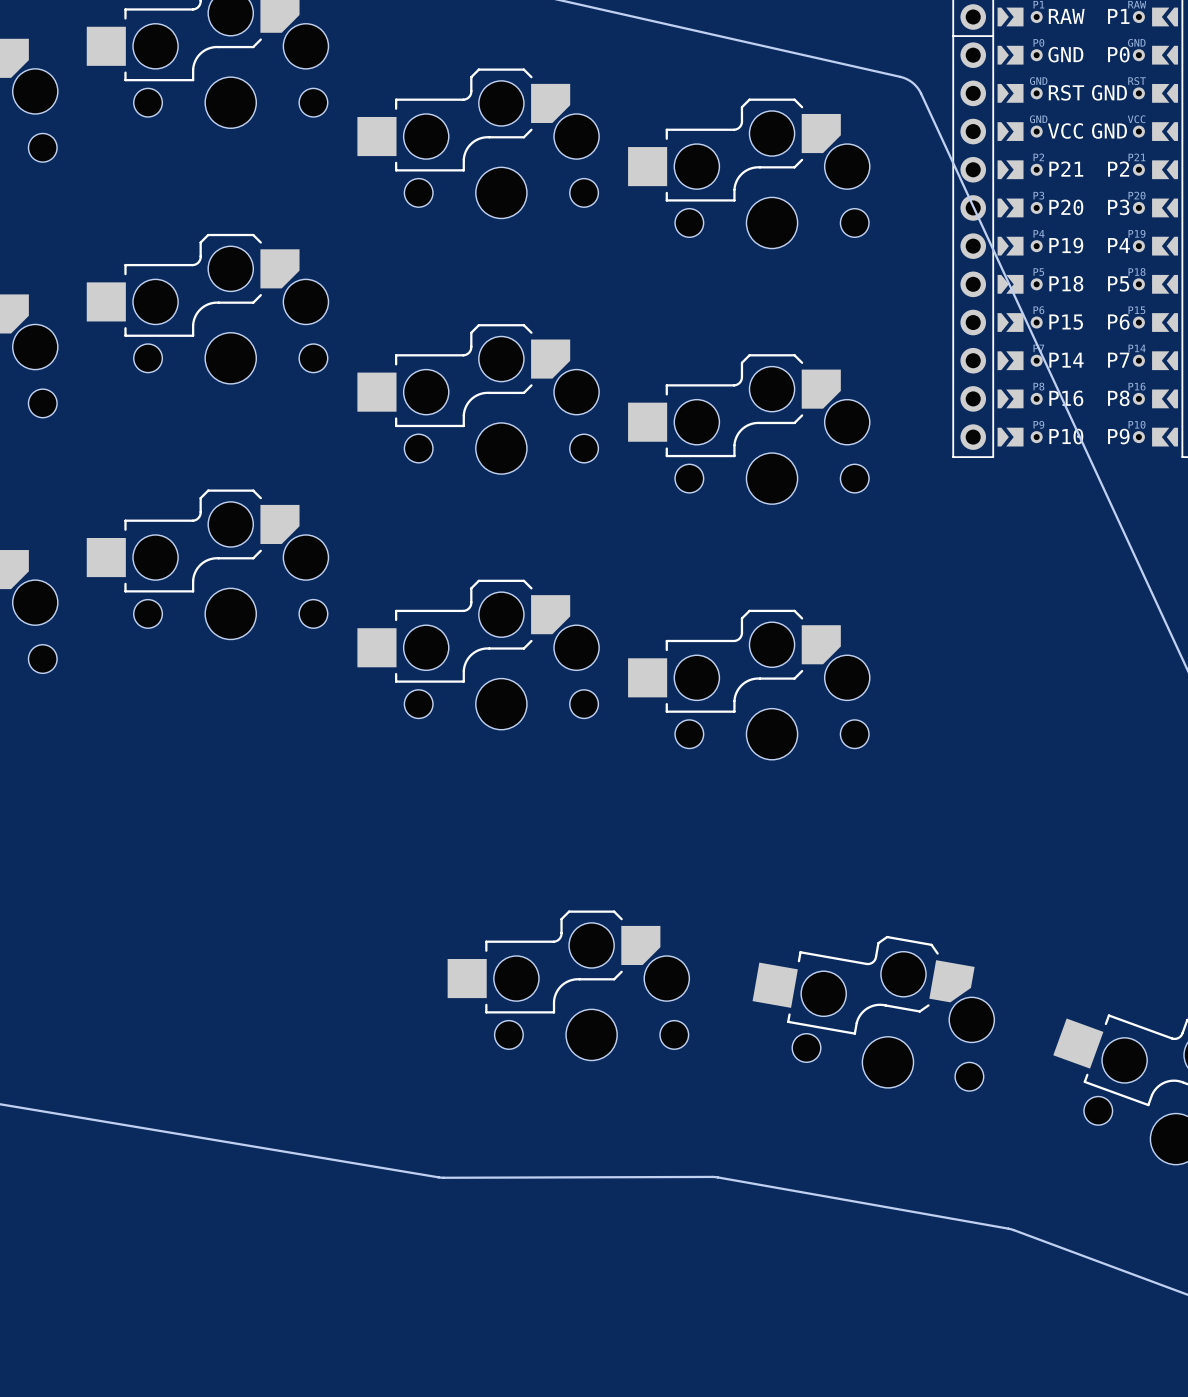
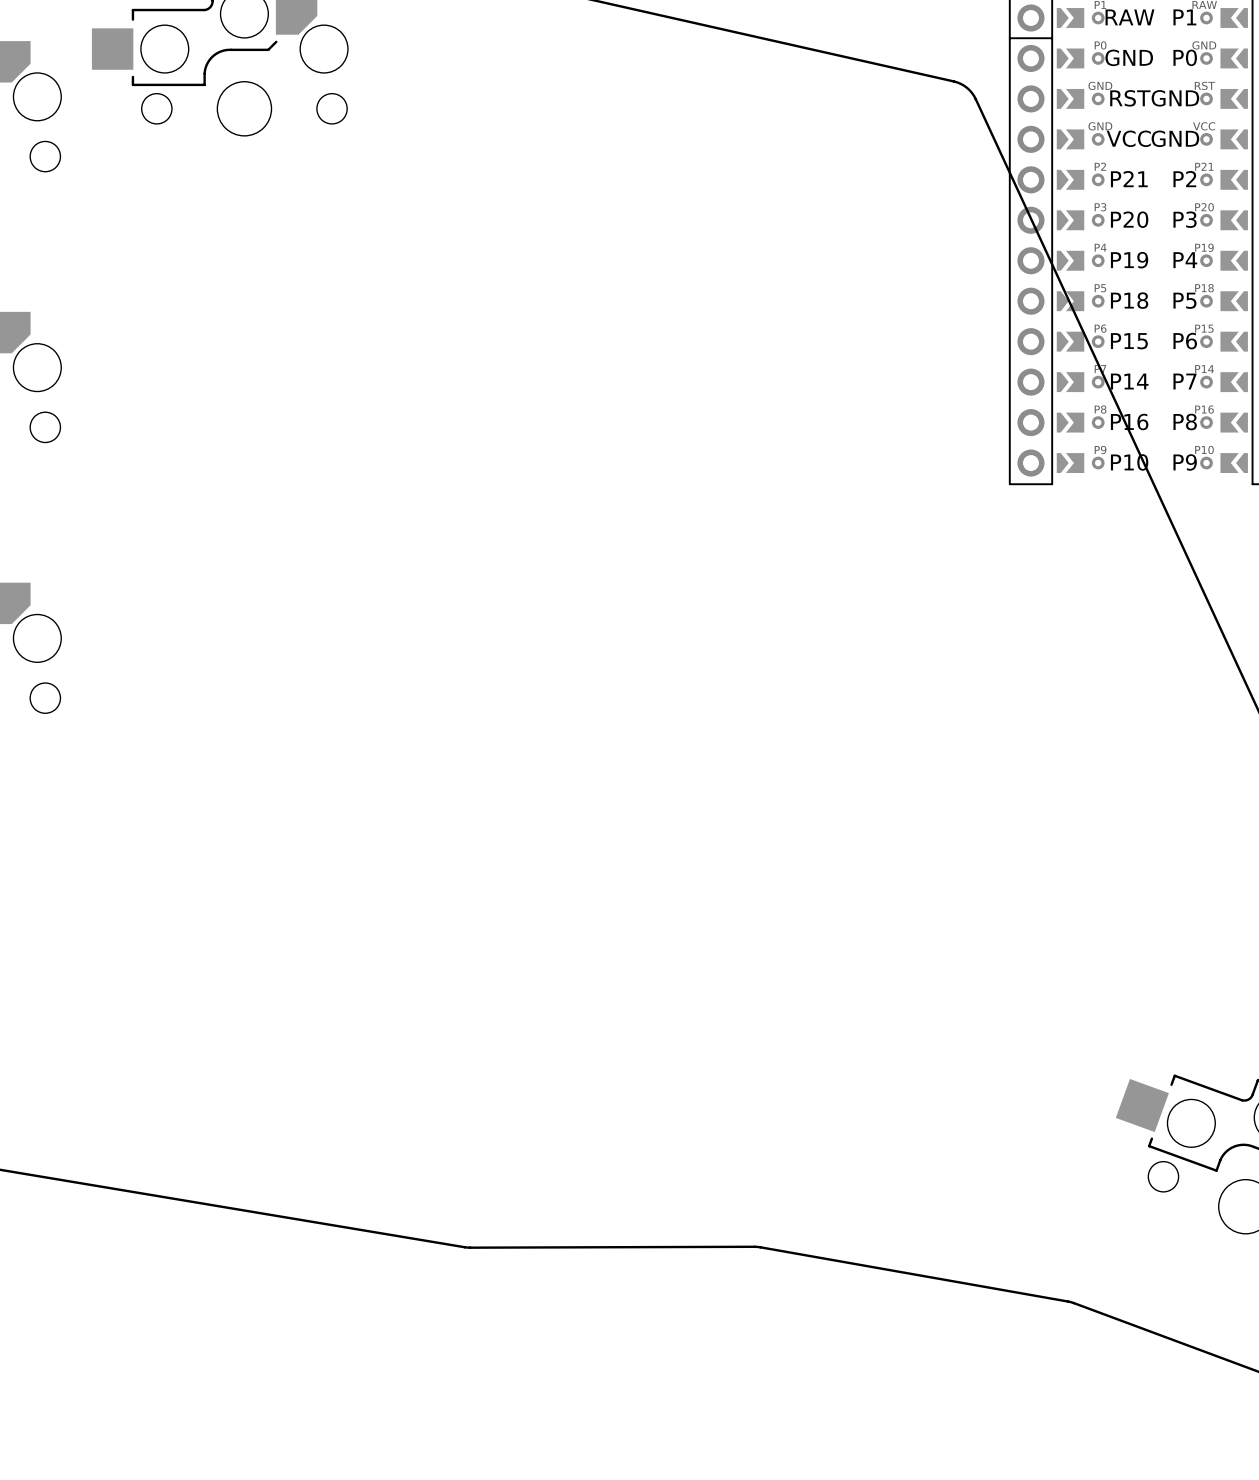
part: (478, 143) -> none
part: (748, 173) -> none
part: (207, 308) -> none
part: (478, 399) -> none
part: (748, 429) -> none
part: (207, 564) -> none
part: (478, 654) -> none
part: (748, 684) -> none
part: (568, 985) -> none
part: (873, 1013) -> none

